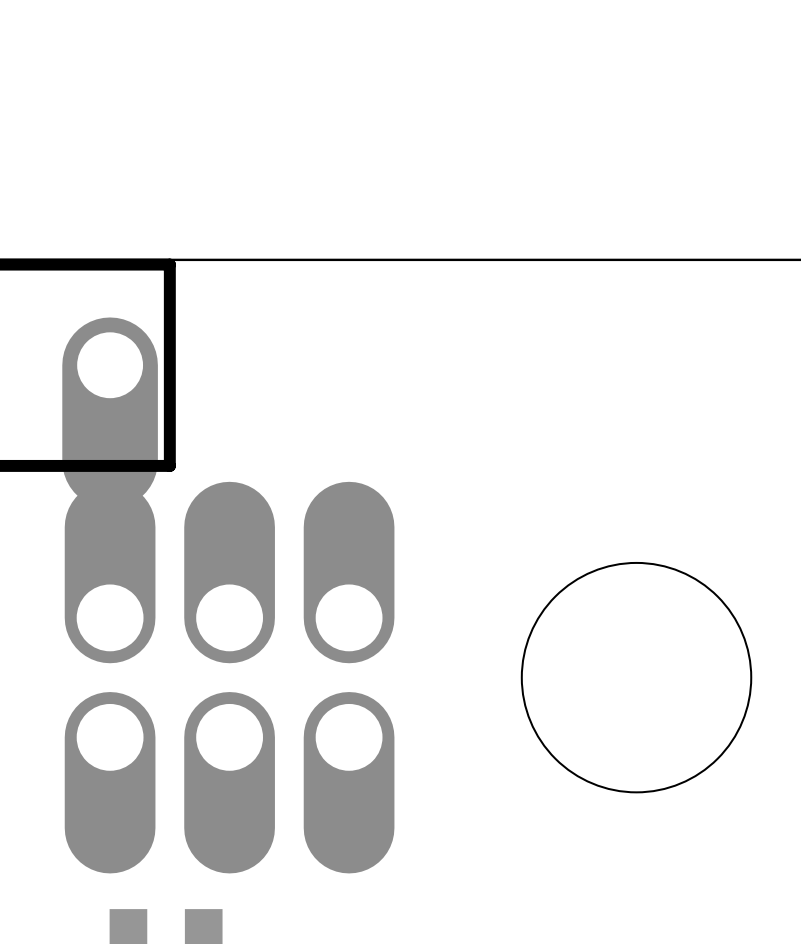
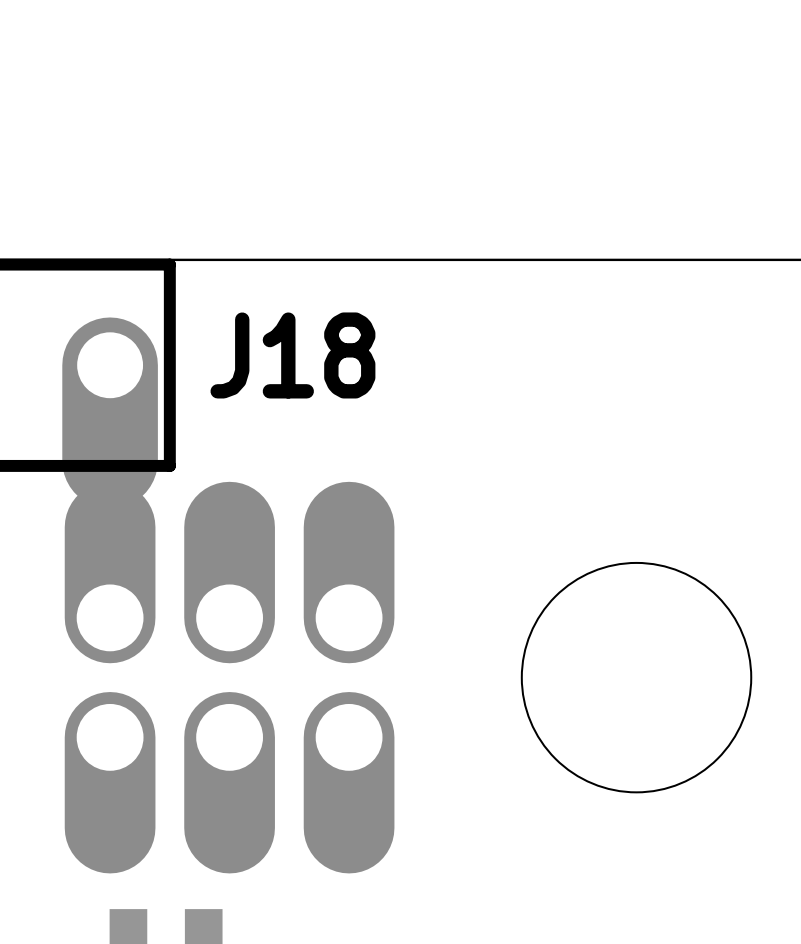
J18 name: none -> J18 (292, 355)

